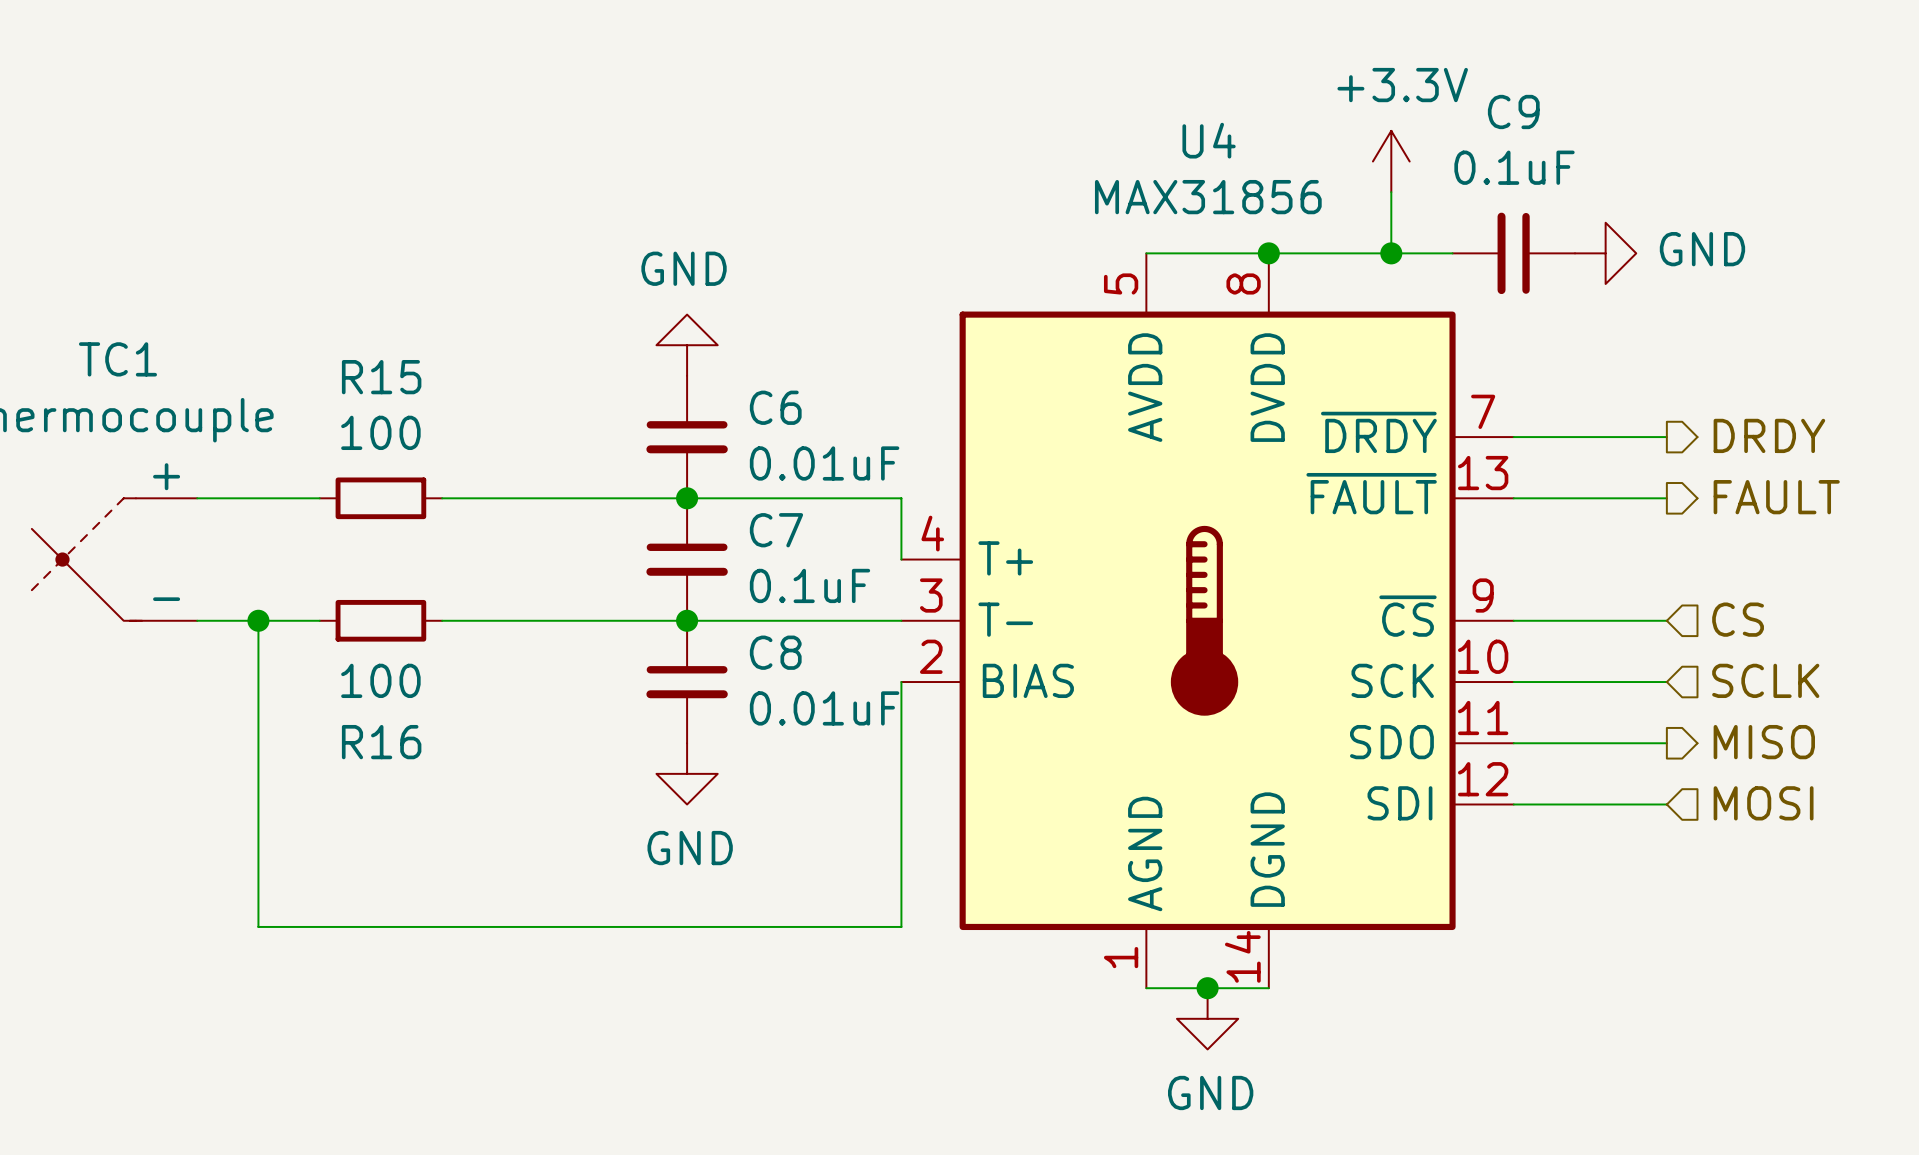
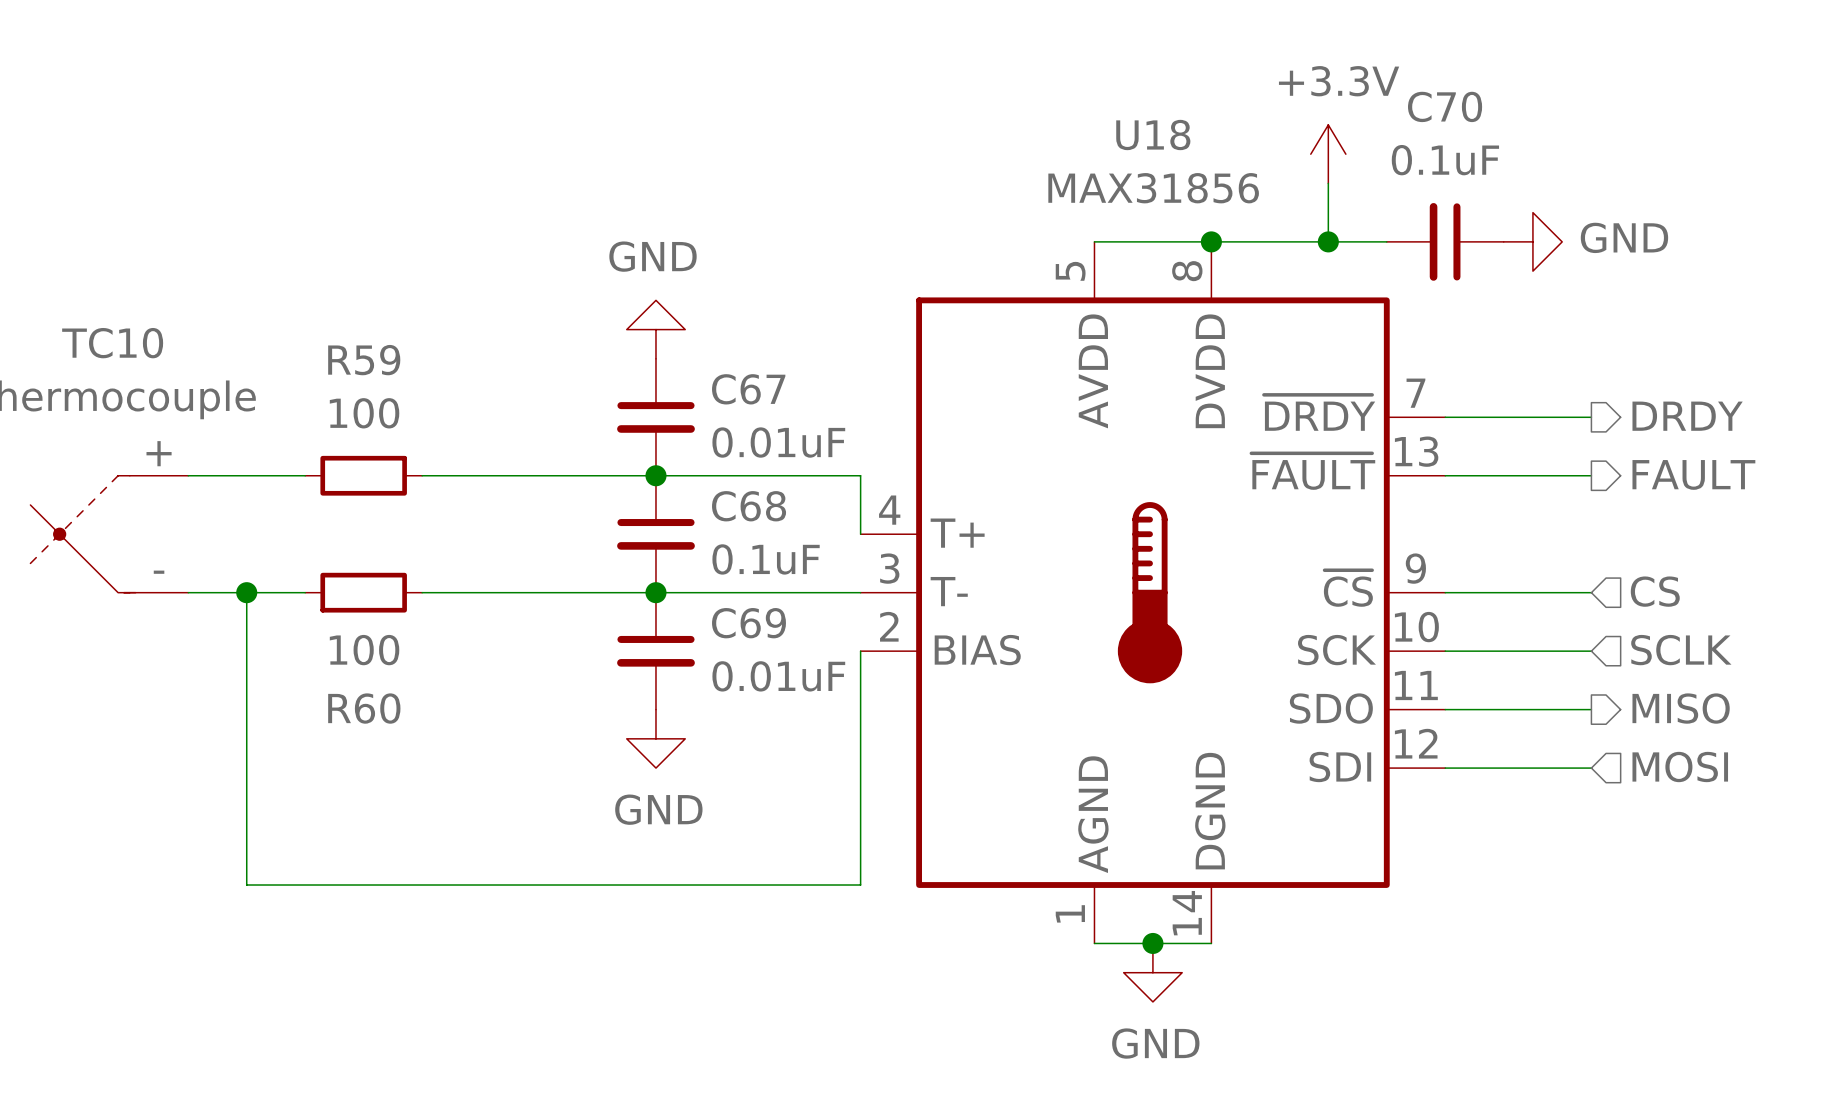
C9 name: C9 (1513, 111) -> C70 (1445, 106)
U4 name: U4 (1209, 140) -> U18 (1153, 135)
TC1 name: TC1 (117, 359) -> TC10 (112, 343)
R15 name: R15 (381, 377) -> R59 (364, 360)
C6 name: C6 (775, 407) -> C67 (748, 389)
C7 name: C7 (776, 530) -> C68 (749, 506)
C8 name: C8 (775, 652) -> C69 (749, 623)
R16 name: R16 (381, 742) -> R60 (364, 708)

